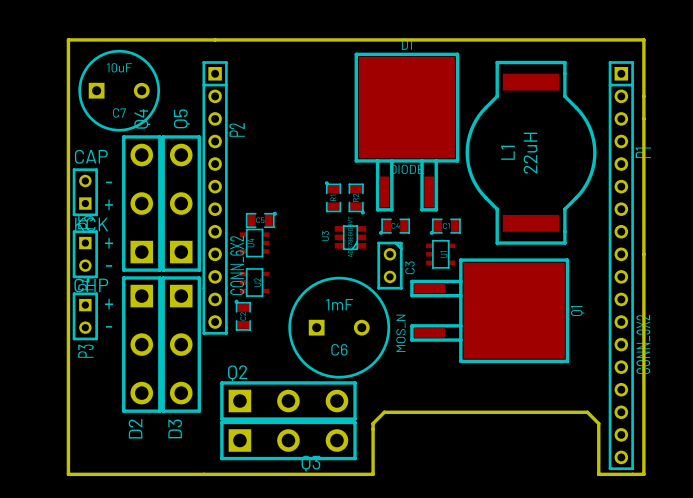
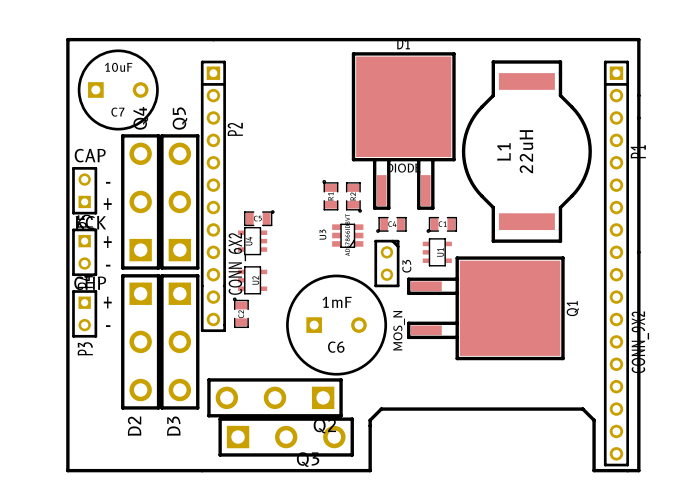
Q2 rotation: 0° (288, 401) -> 180° (274, 397)

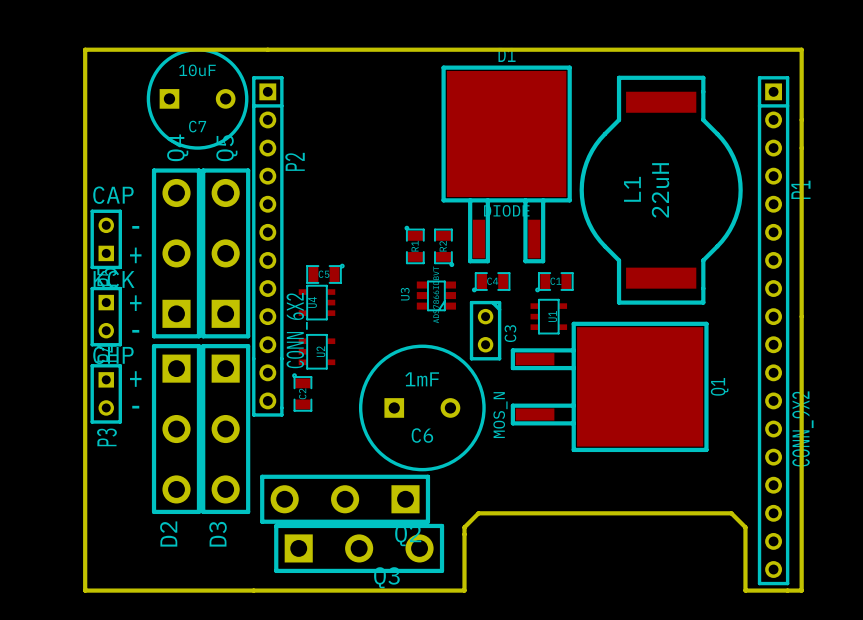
C7 position: (118, 89) -> (197, 98)

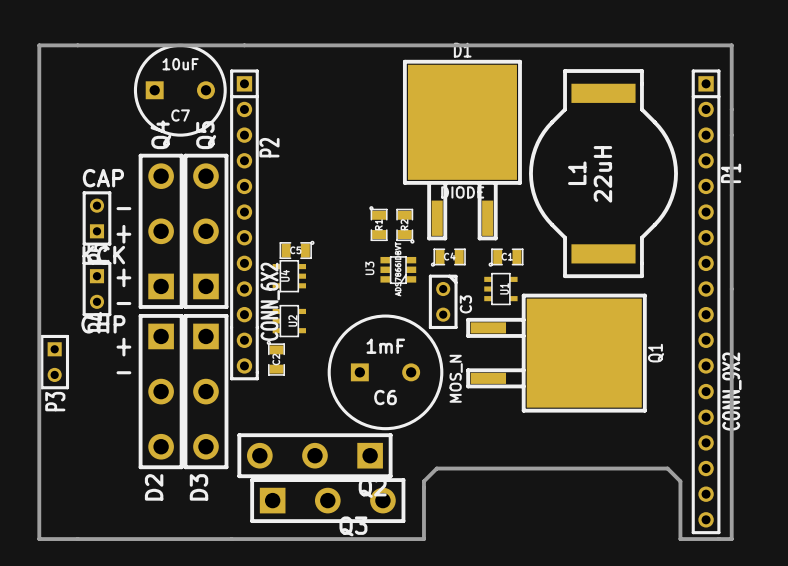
board edge: (85, 49) (85, 590) -> (77, 45) (39, 45) (39, 539) (77, 539)
P3 position: (106, 393) -> (54, 362)

